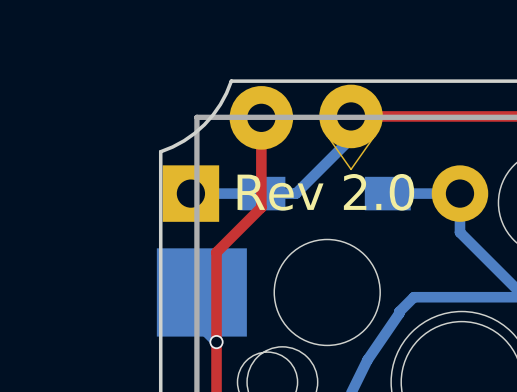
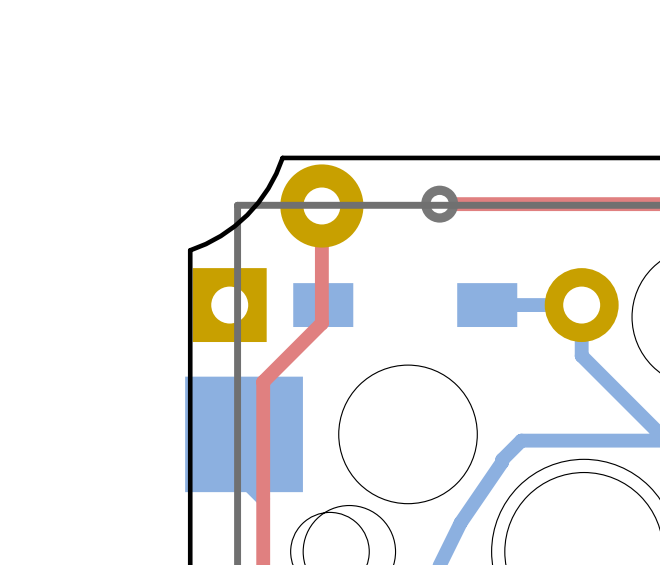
bottom track: (351, 116) (351, 138) (295, 193) (190, 193) -> none
via: none -> (439, 204)
part: (351, 127) -> none
text: Rev 2.0 (325, 192) -> none
via: (216, 342) -> none

